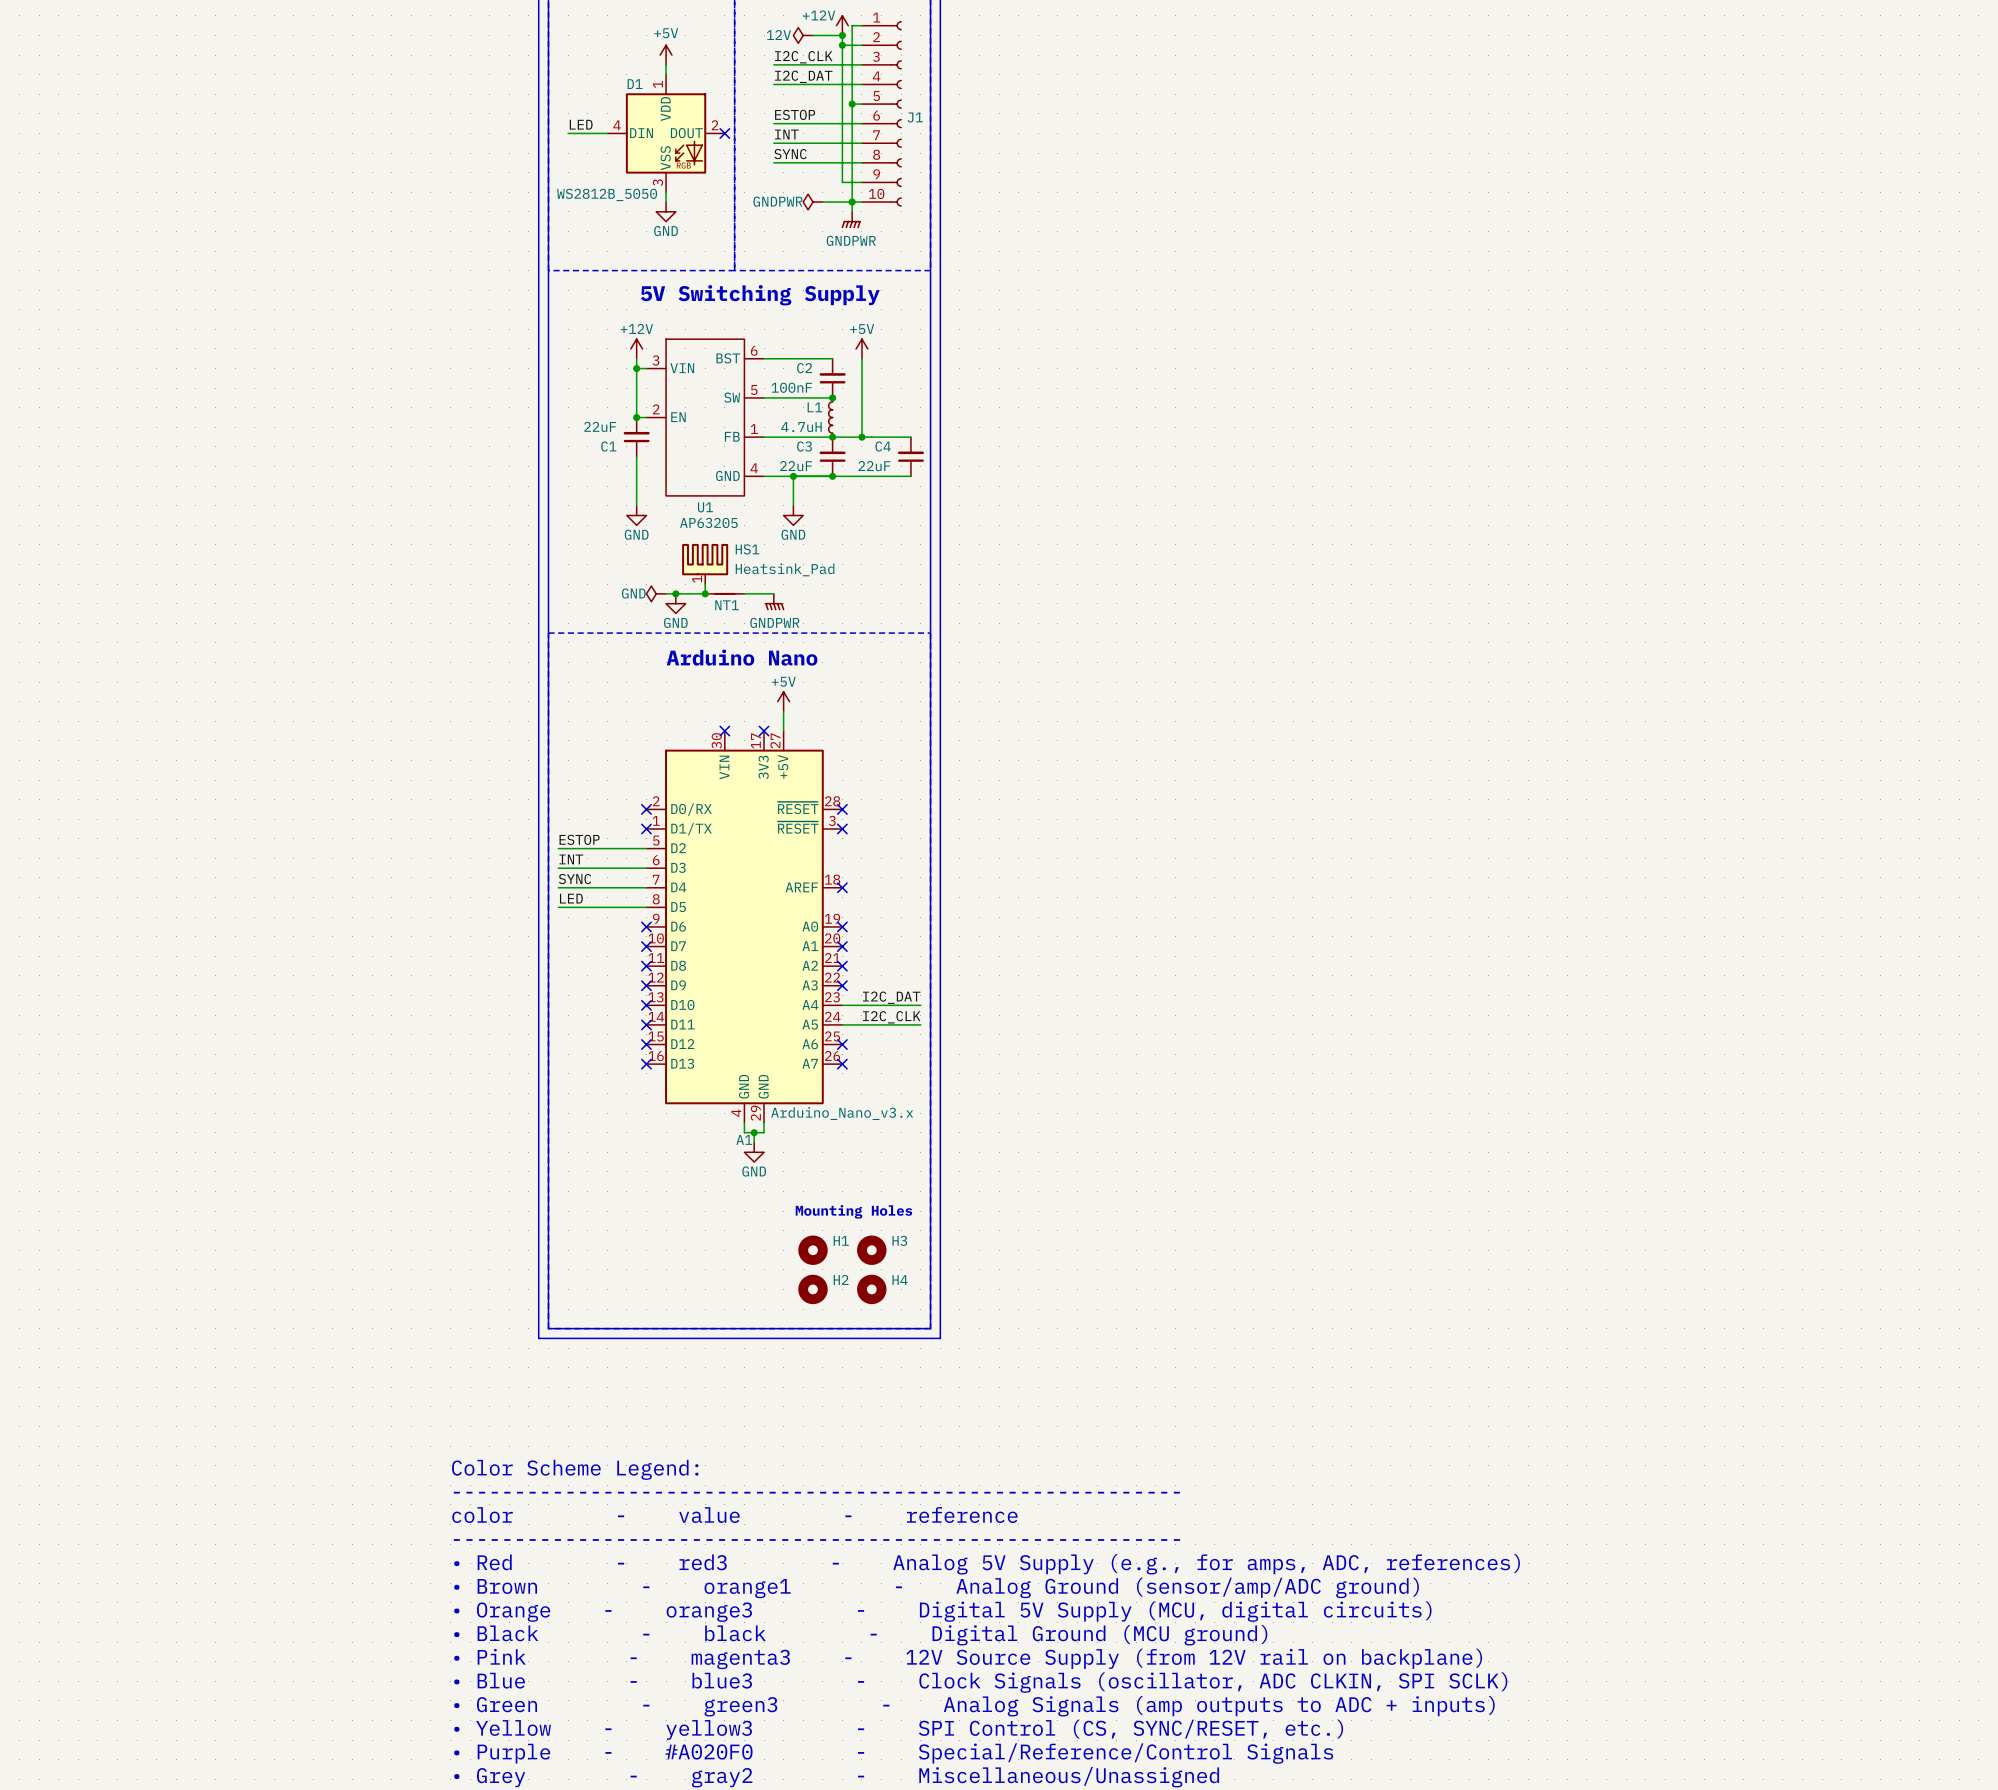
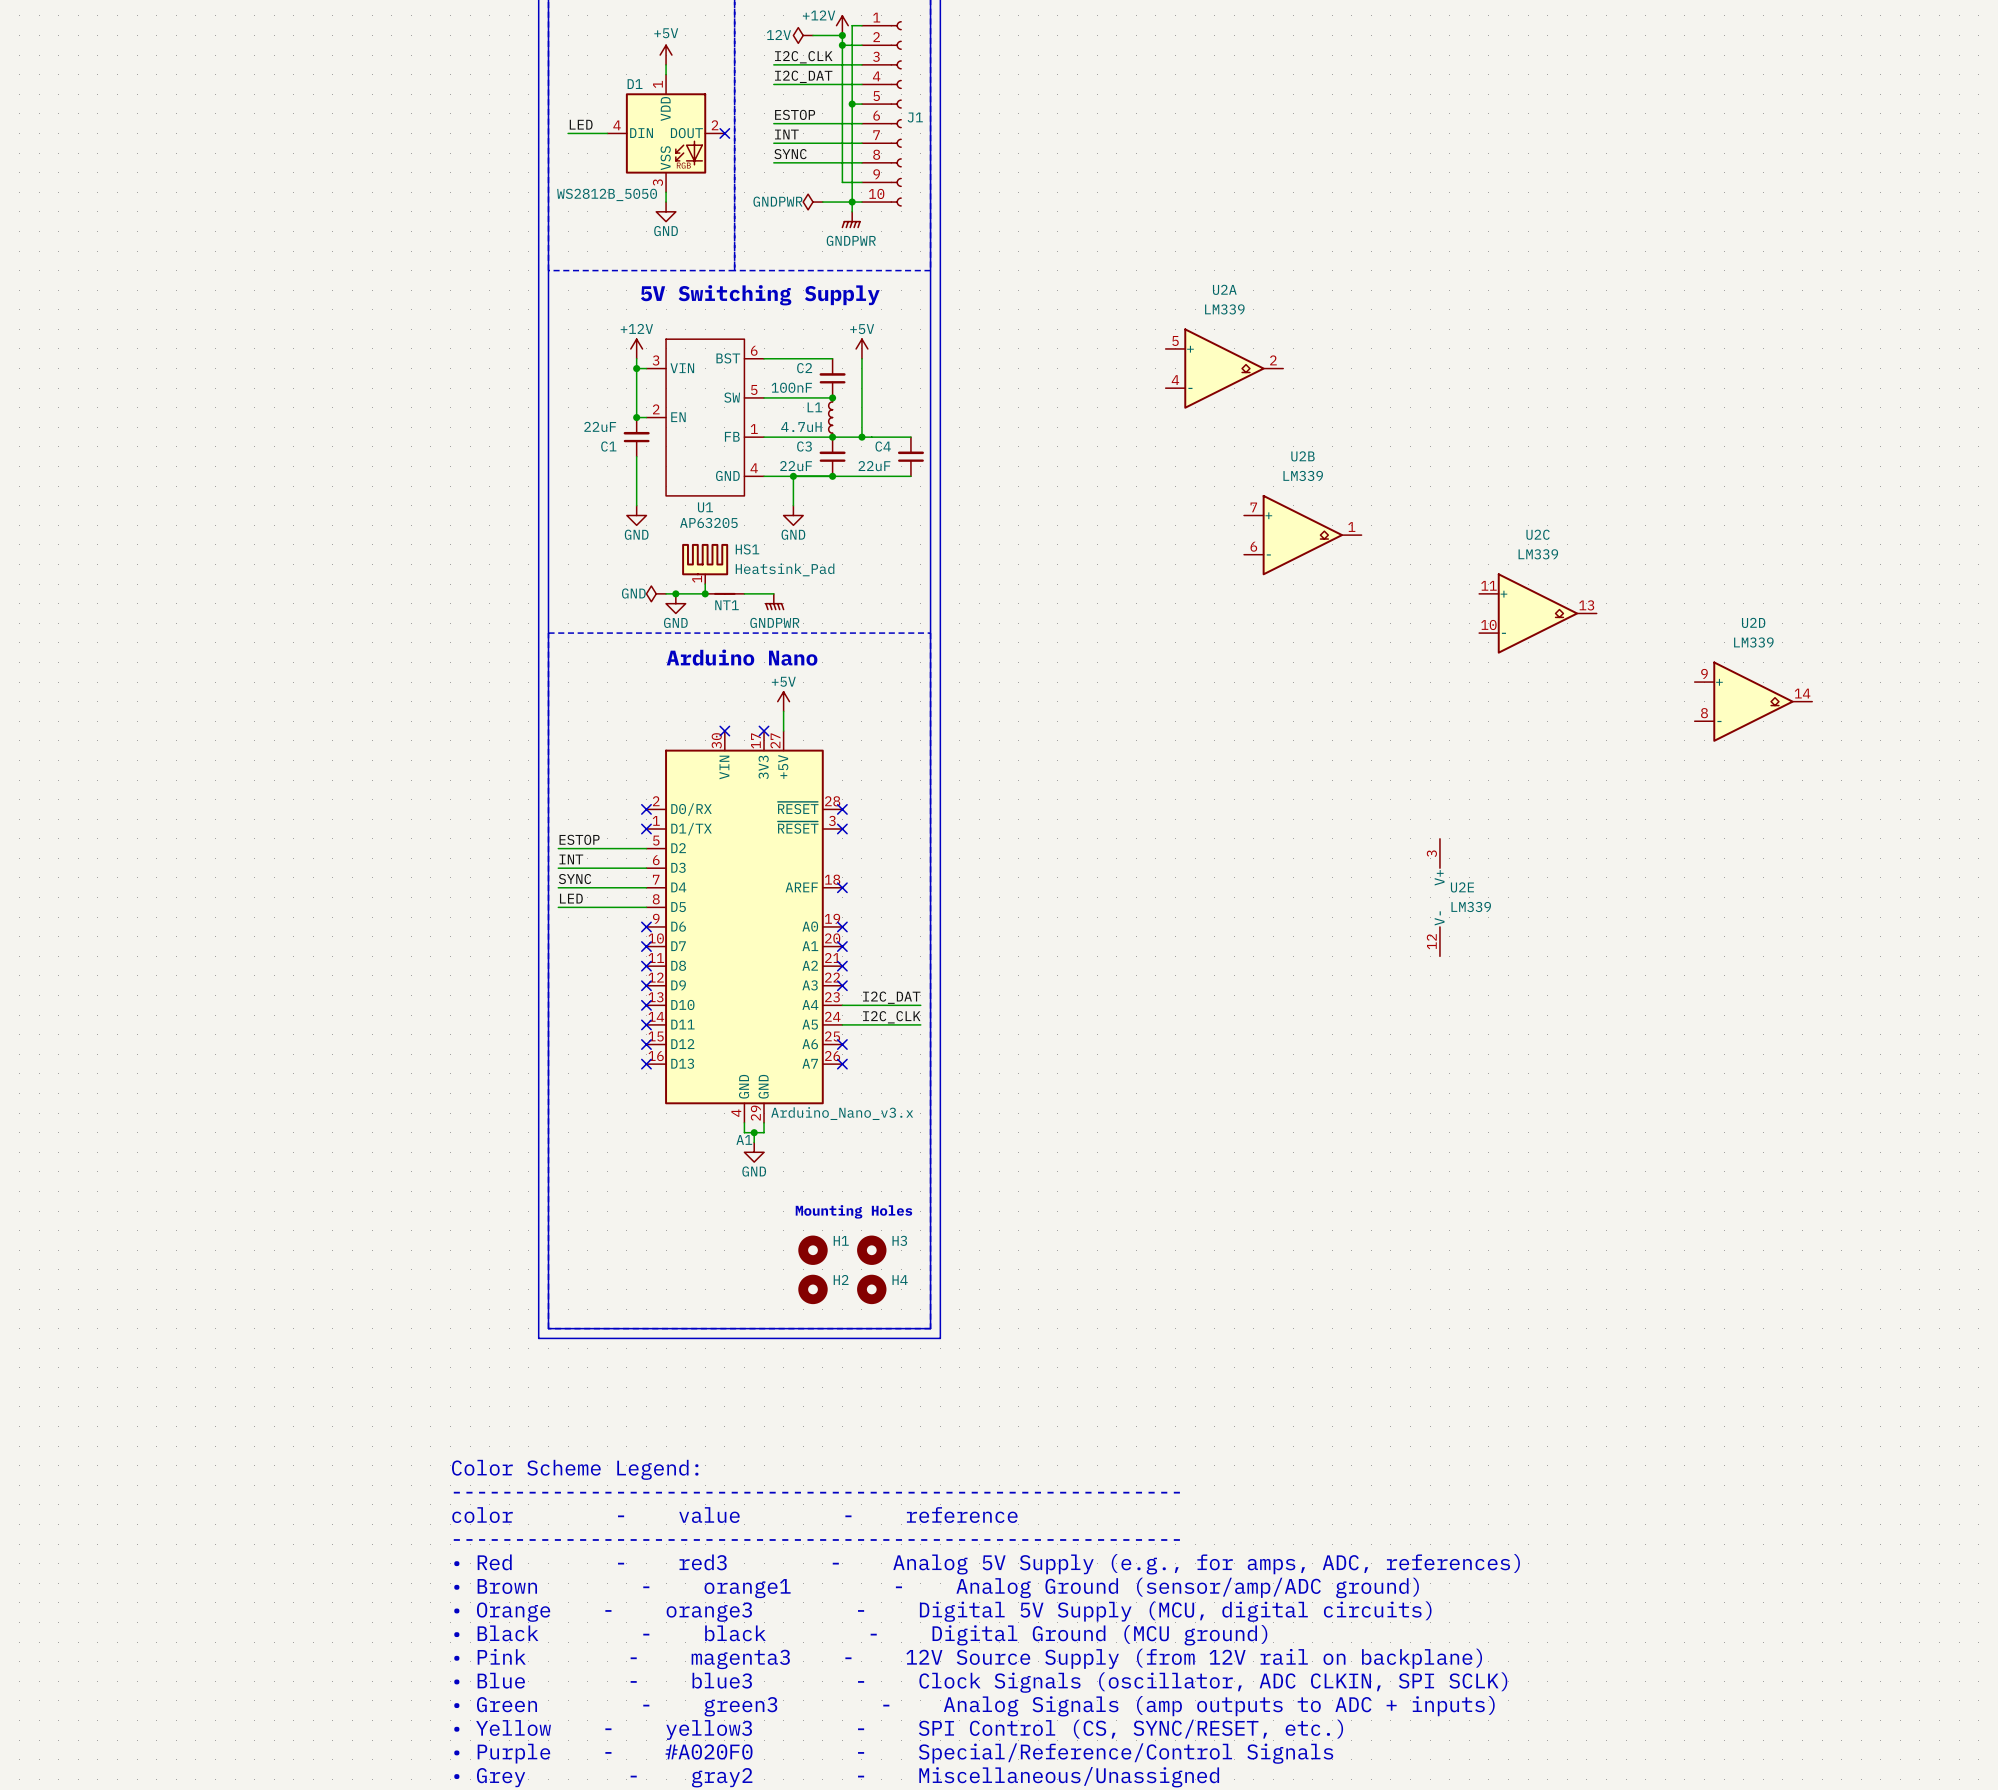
U2A: none -> LM339 (1224, 368)
U2B: none -> LM339 (1302, 535)
U2C: none -> LM339 (1537, 613)
U2D: none -> LM339 (1753, 701)
U2E: none -> LM339 (1439, 897)

